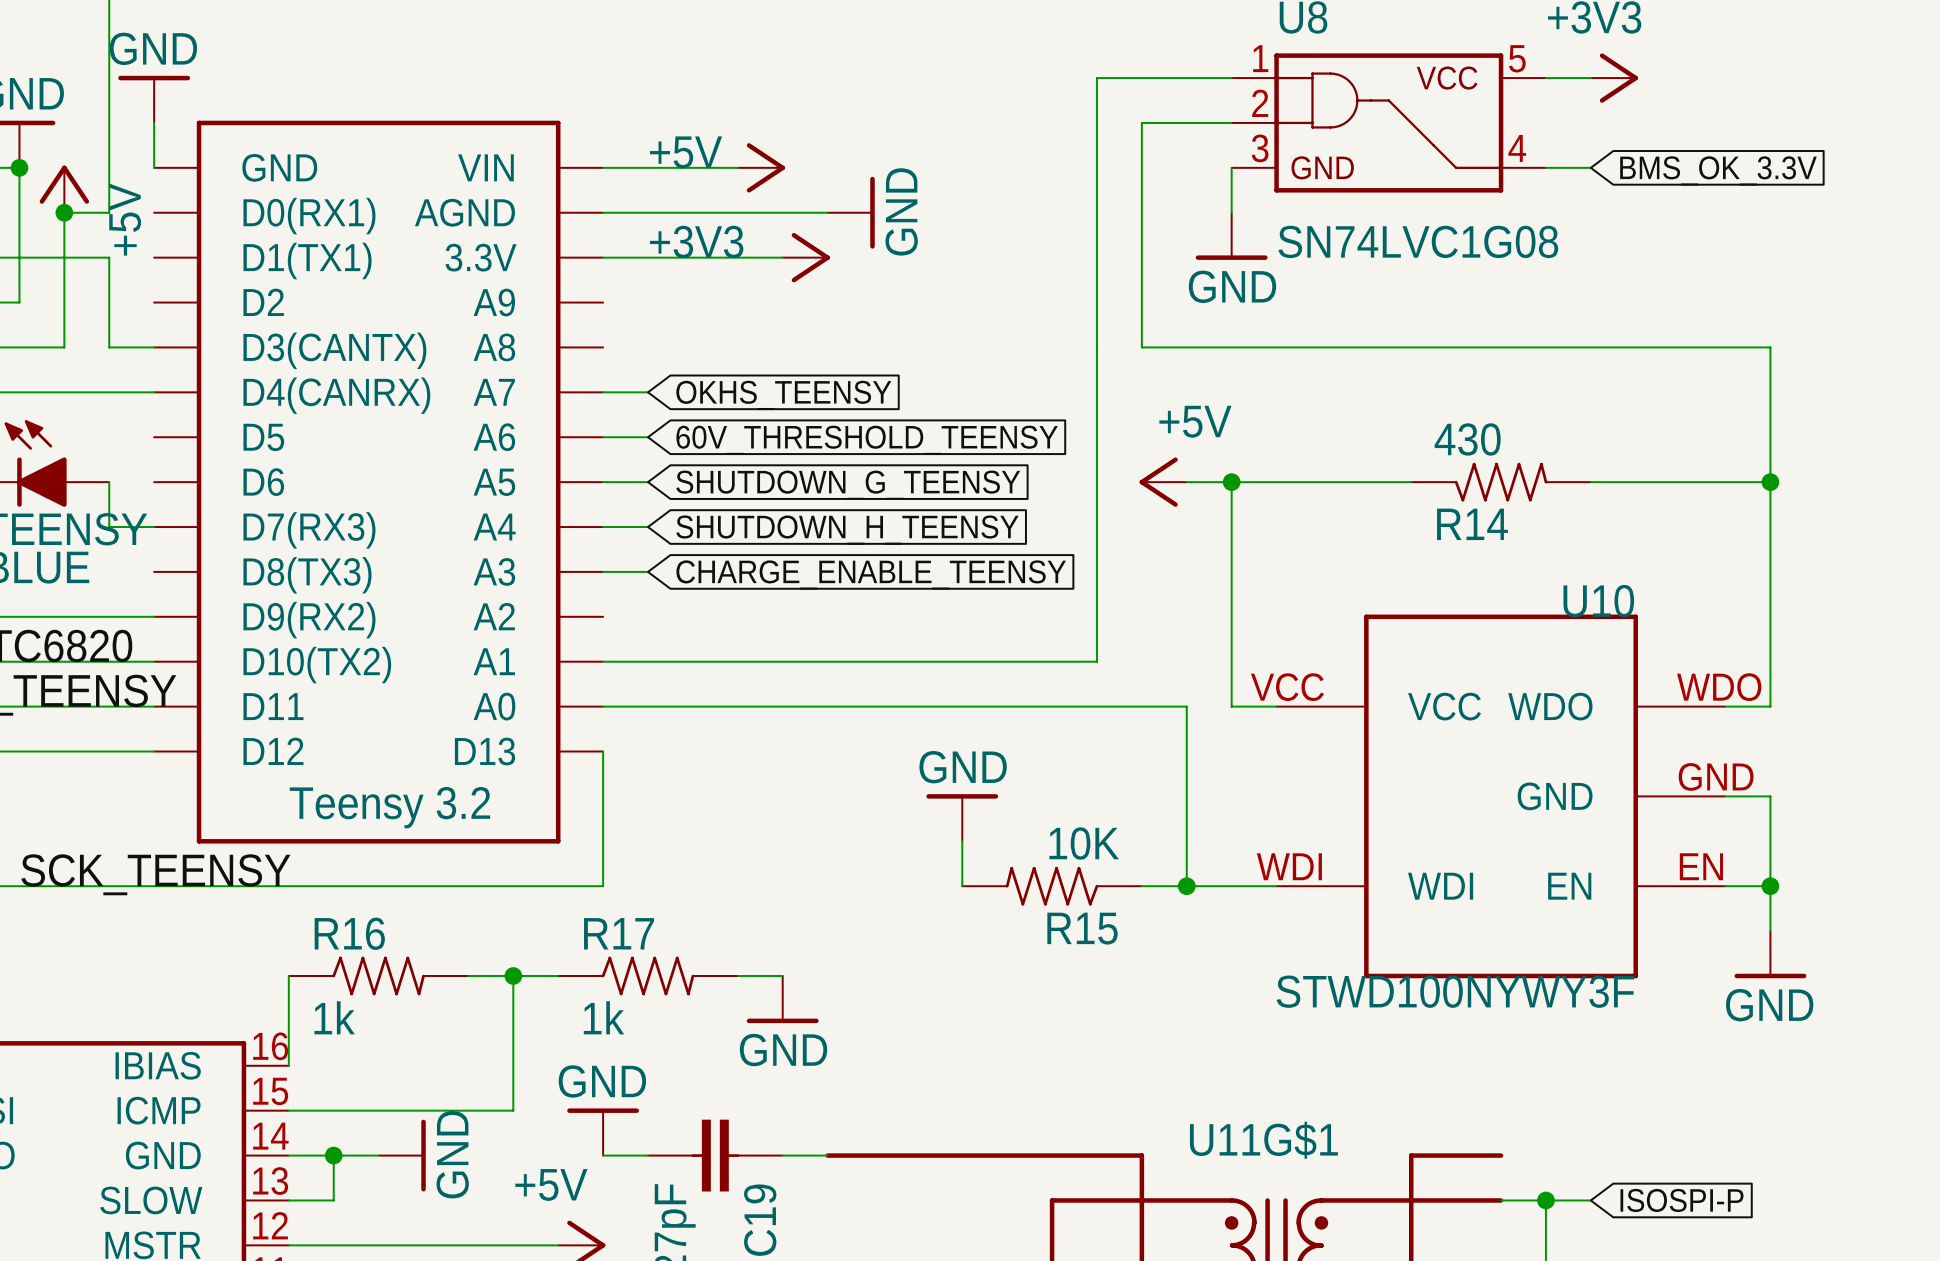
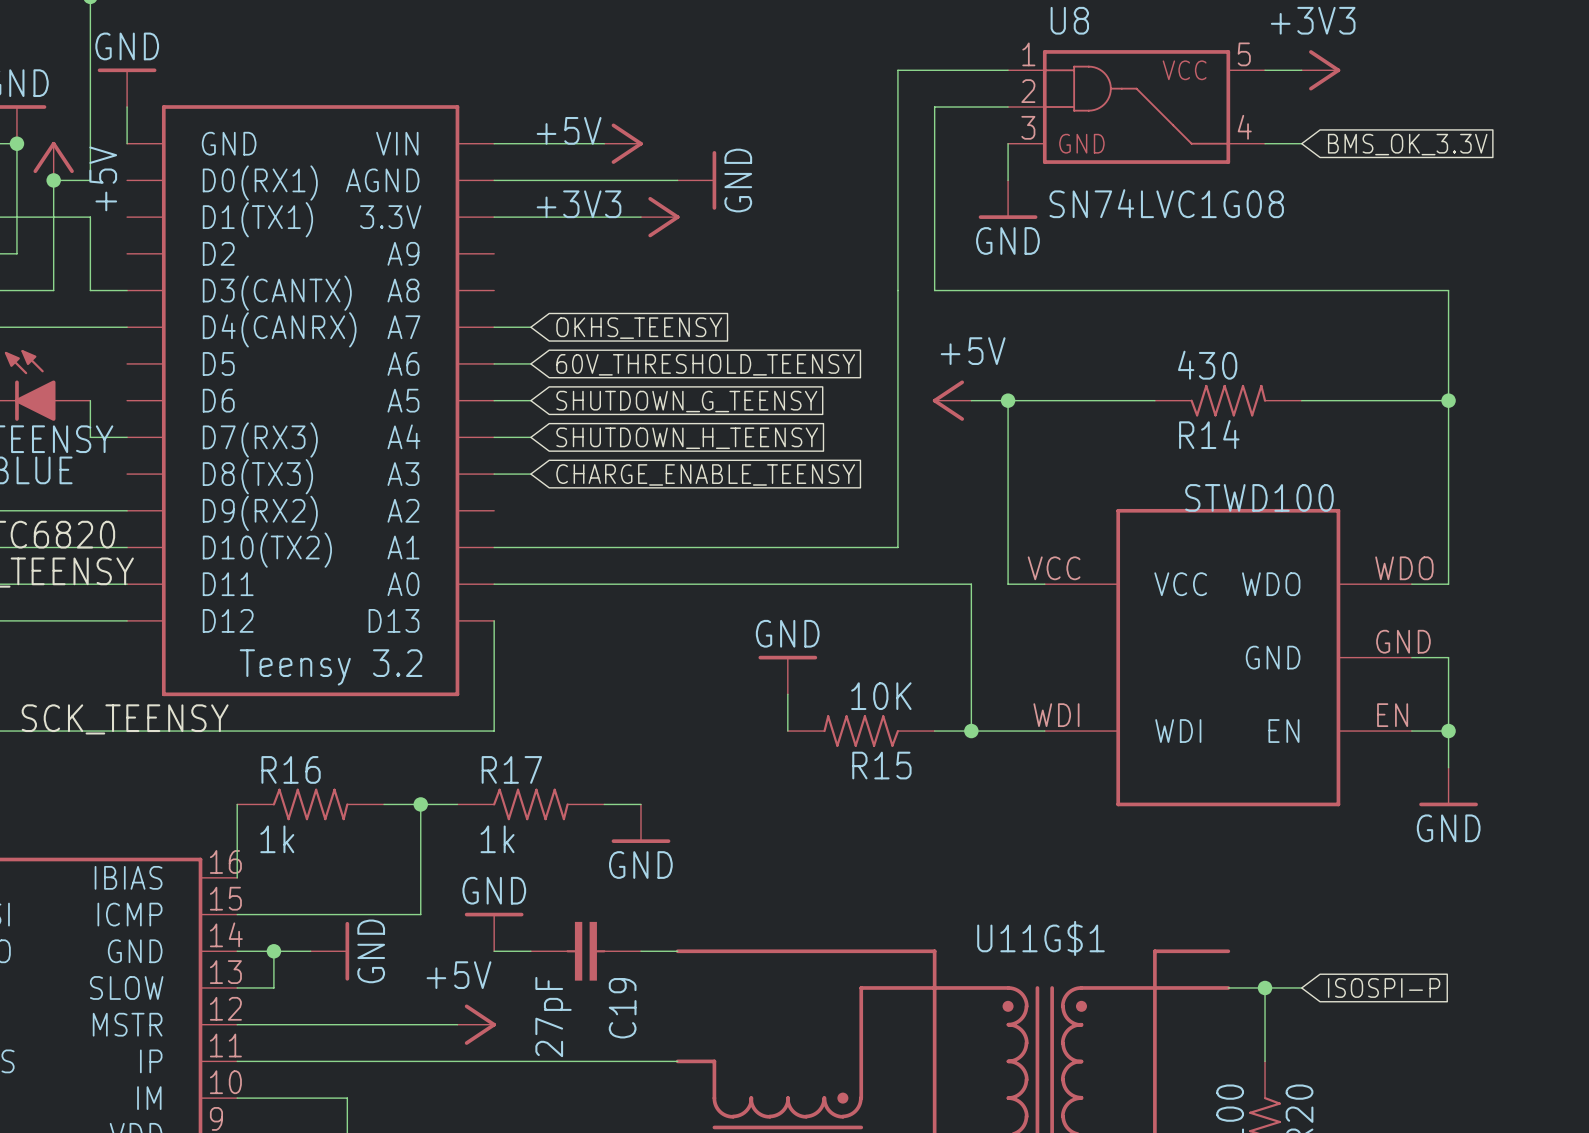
U10 text: none -> STWD100 (1259, 497)
U10 name: U10 (1598, 601) -> none
U10 value: STWD100NYWY3F (1455, 991) -> none

